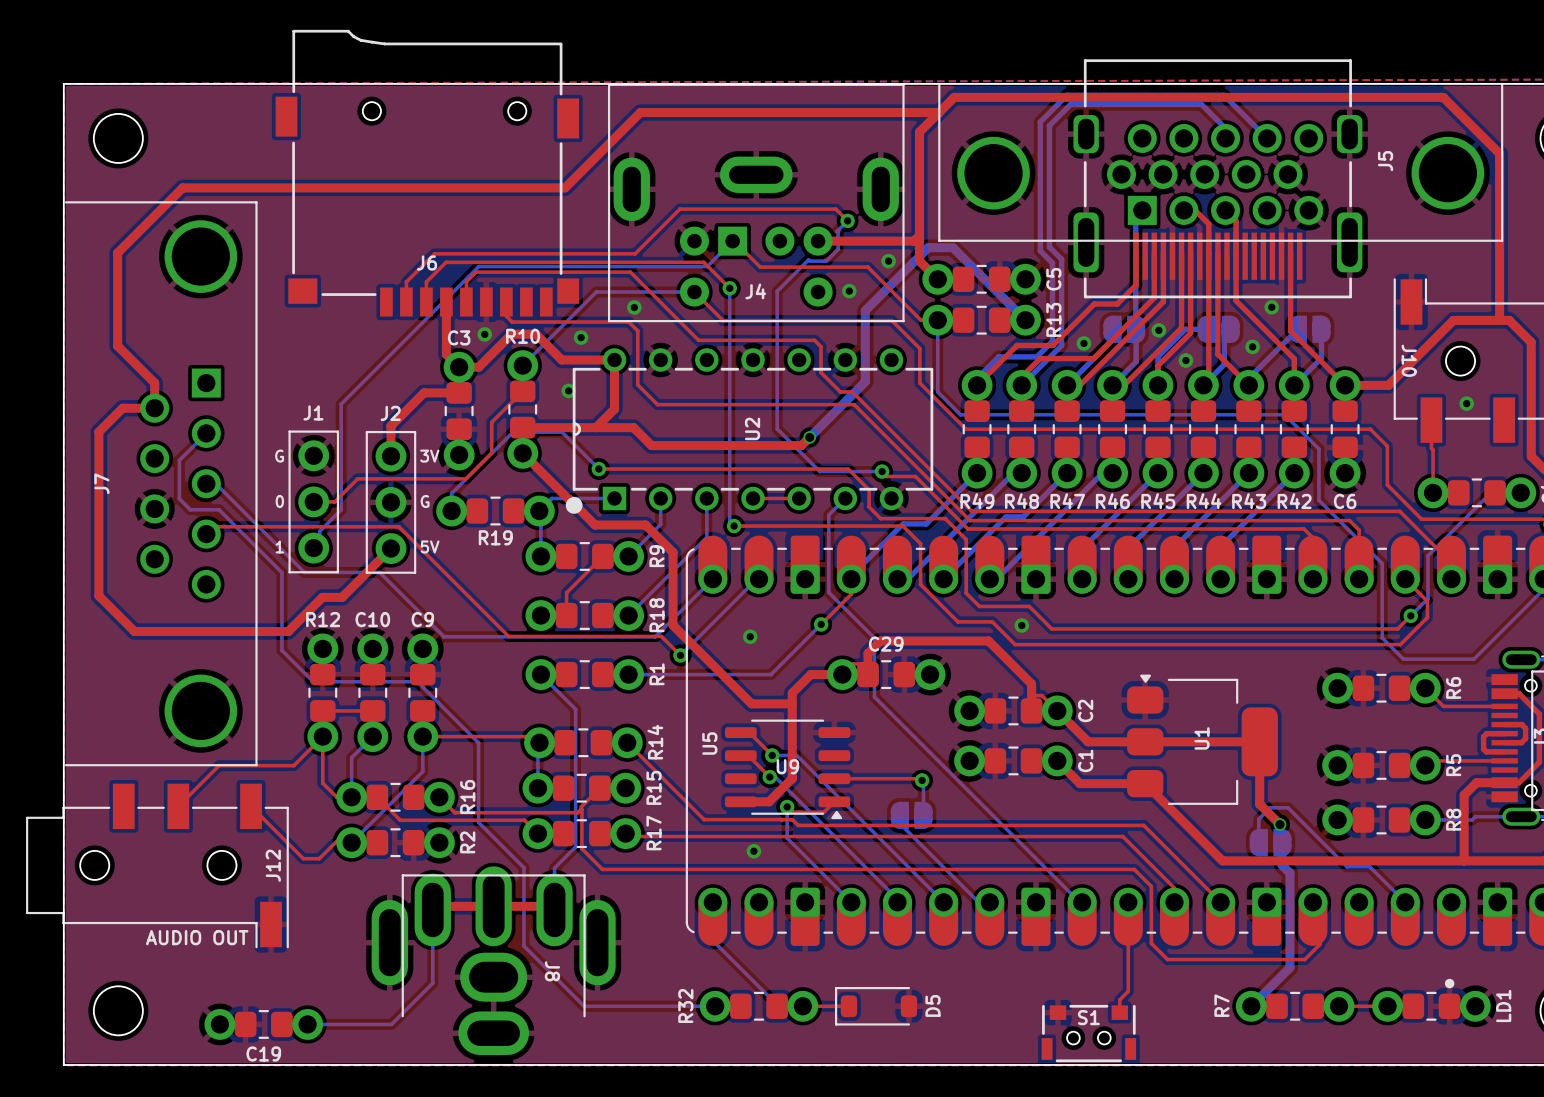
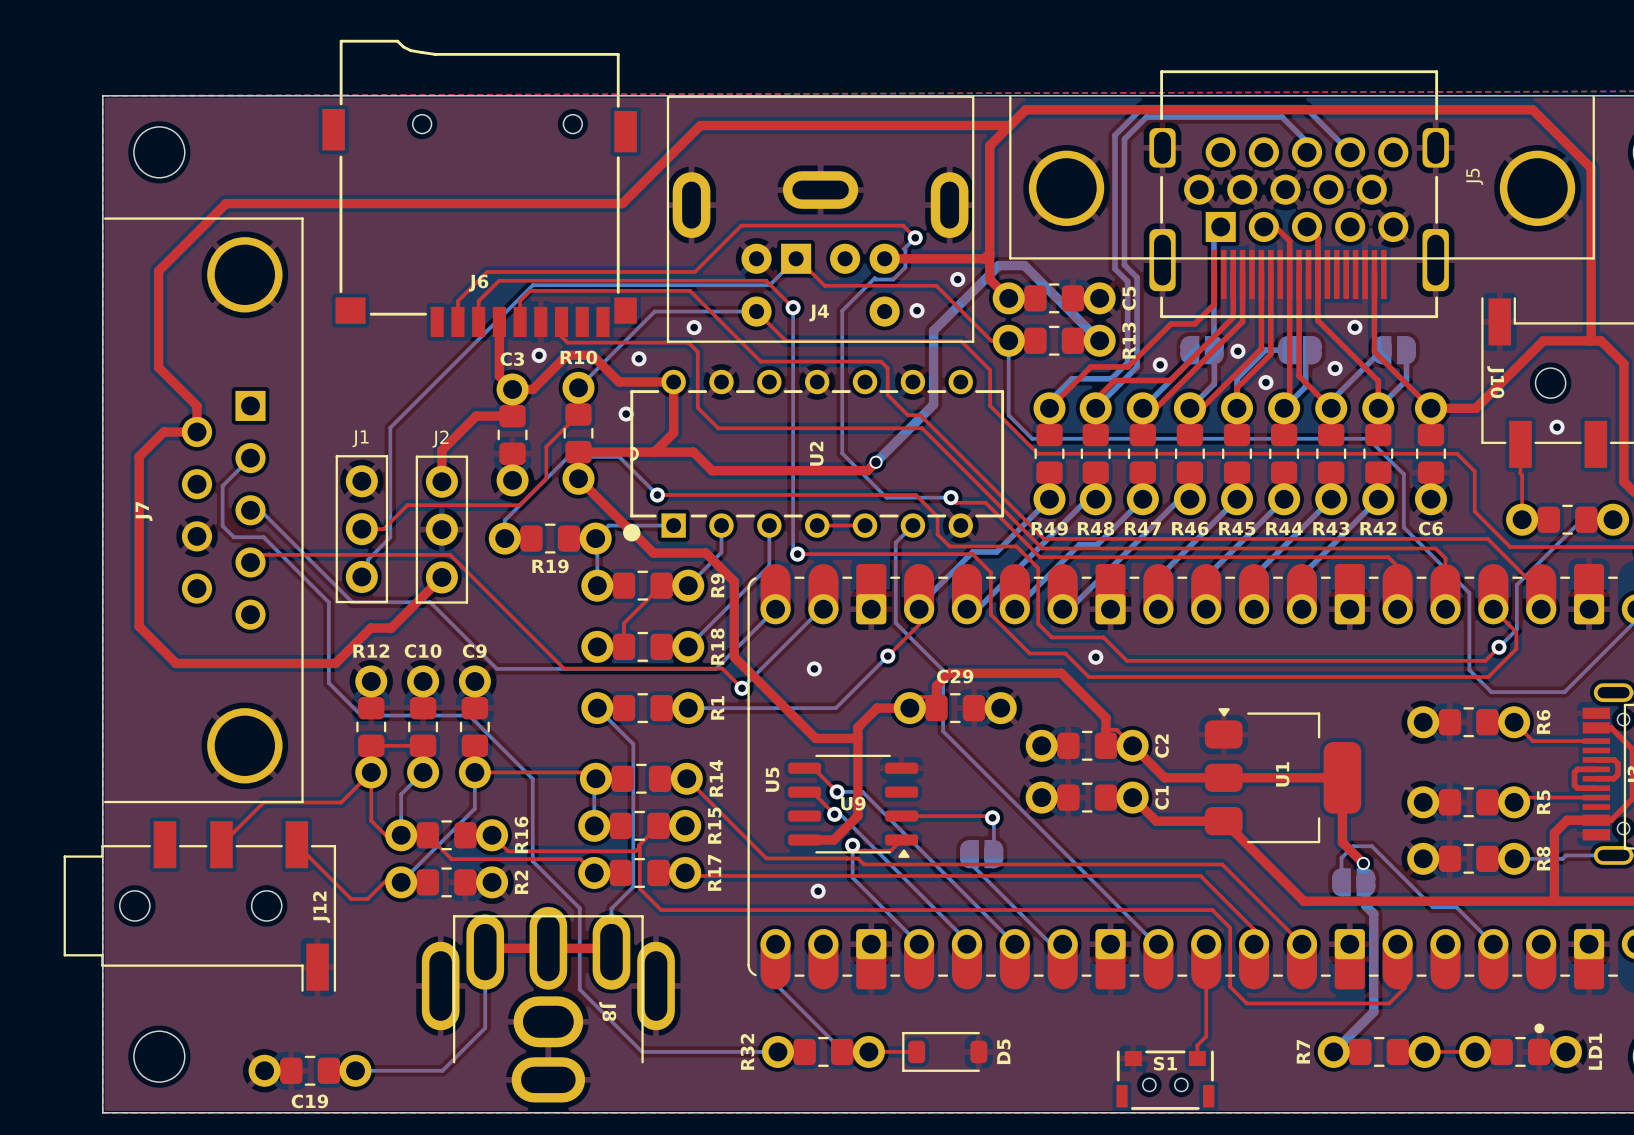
text: G (279, 456) -> none
text: 3V (429, 456) -> none
text: 0 (279, 501) -> none
text: G (425, 501) -> none
text: 1 (279, 546) -> none
text: 5V (430, 546) -> none
text: AUDIO OUT (197, 937) -> none

